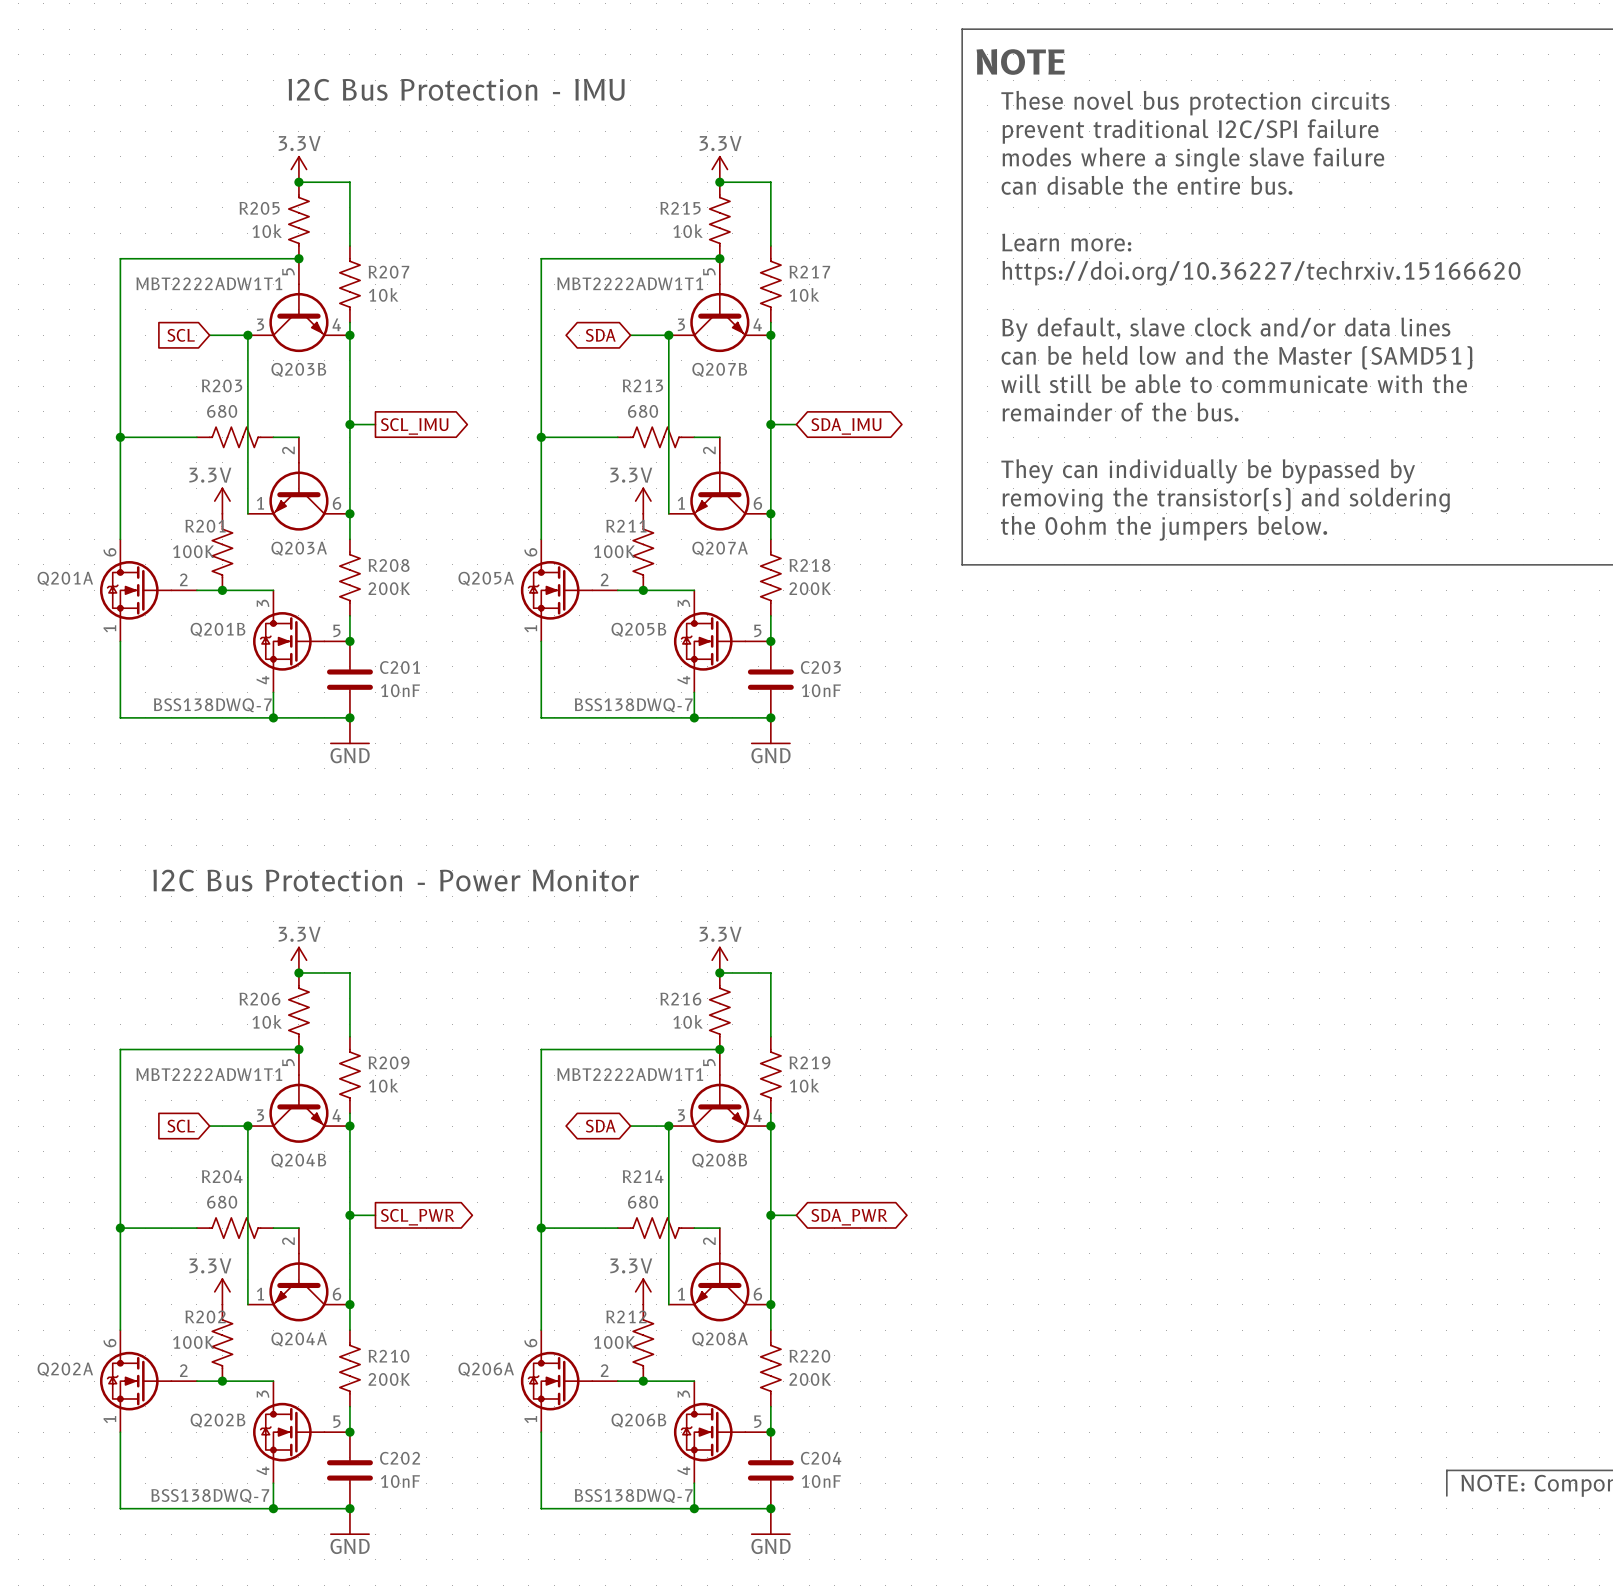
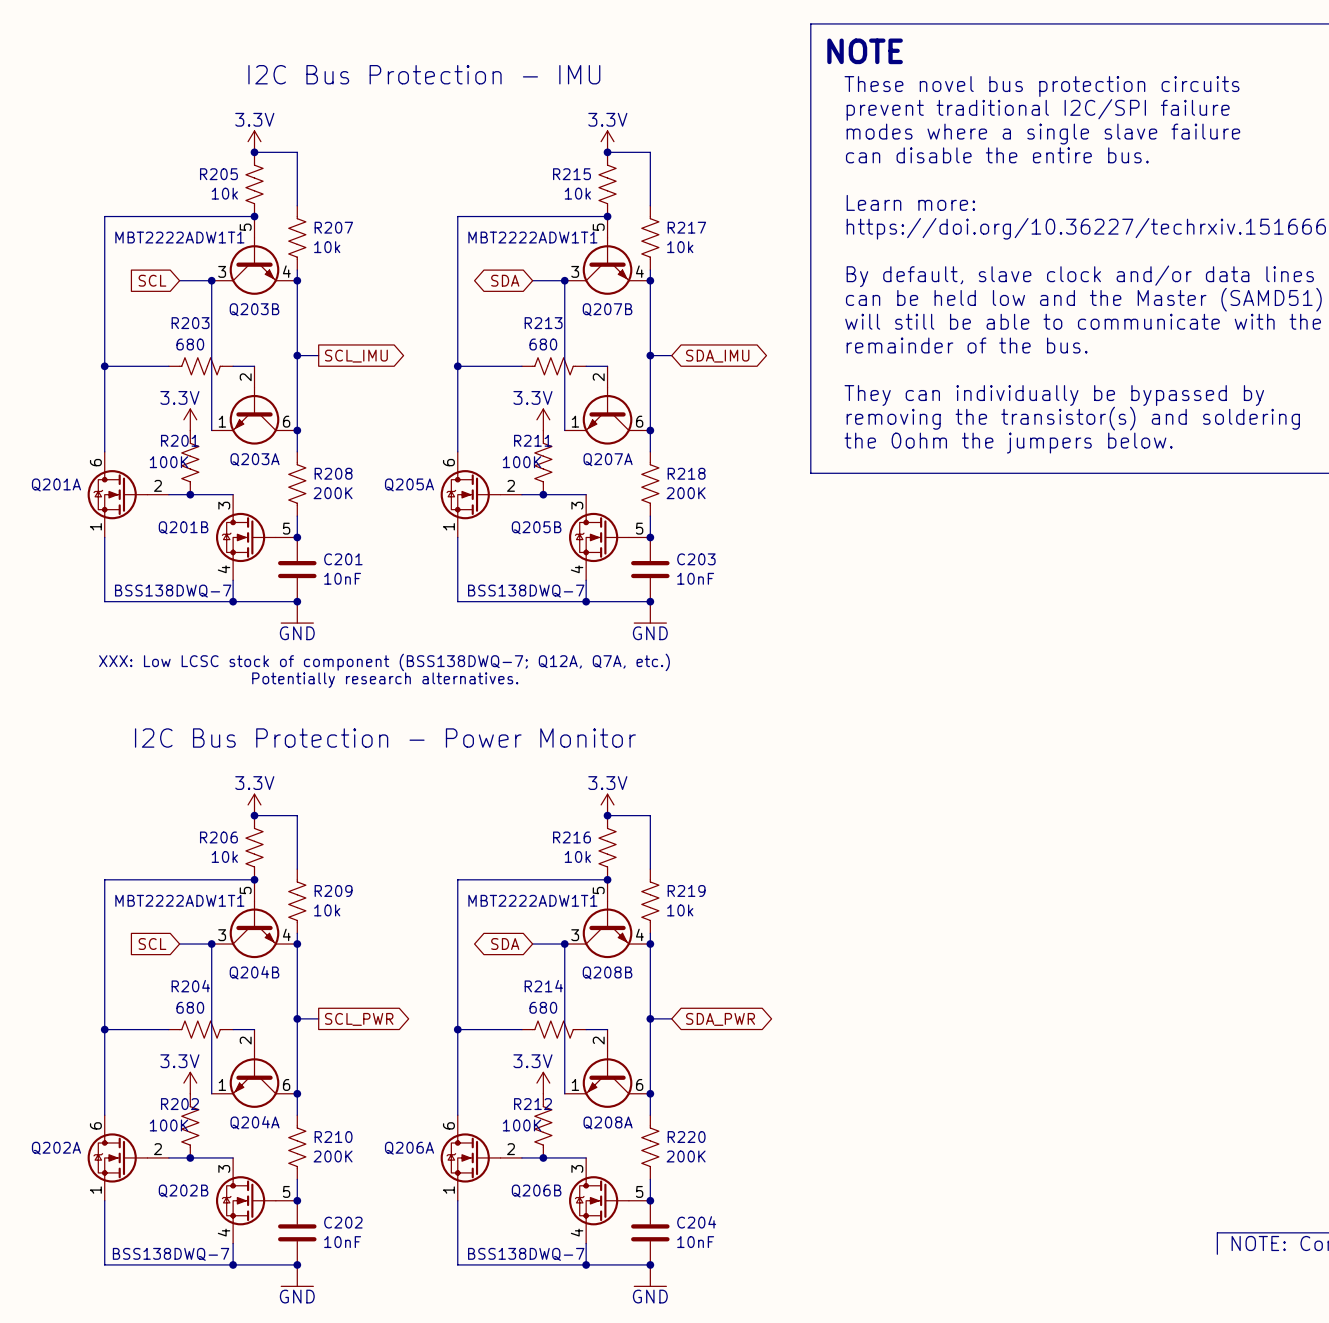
text: none -> XXX: Low LCSC stock of component (BSS138DWQ-7; Q12A, Q7A, etc.) (384, 662)
text: none -> Potentially research alternatives. (385, 680)

